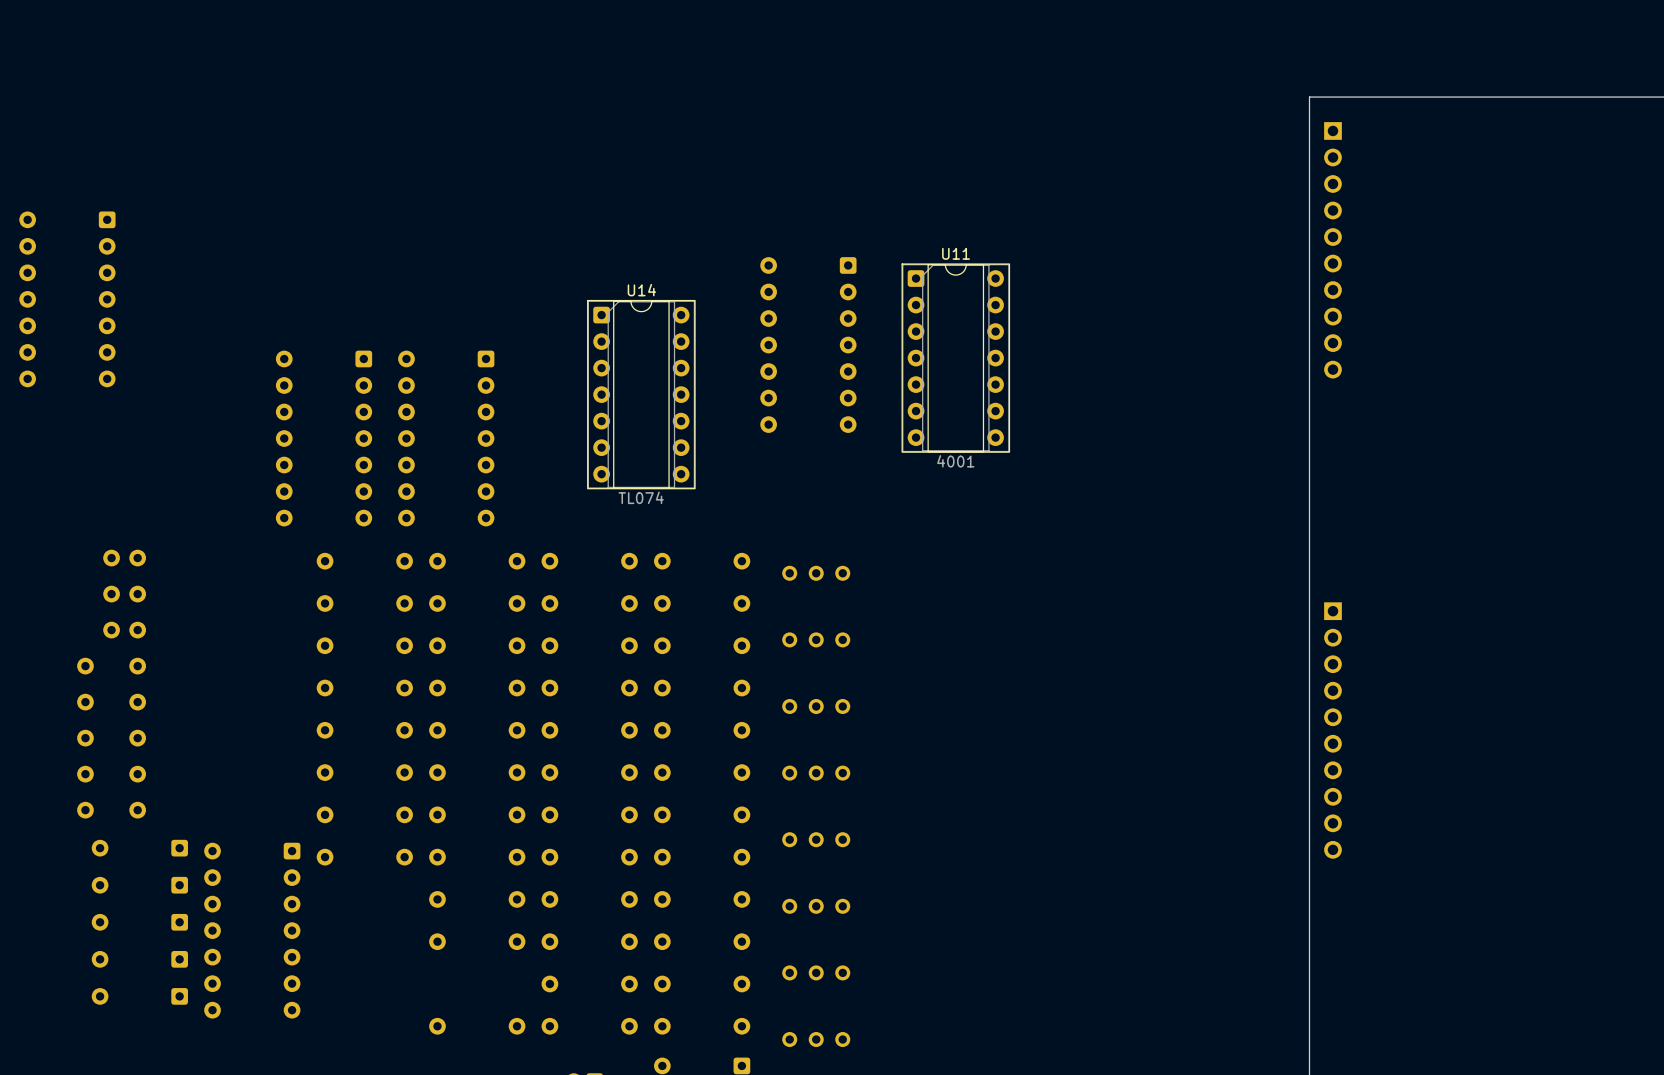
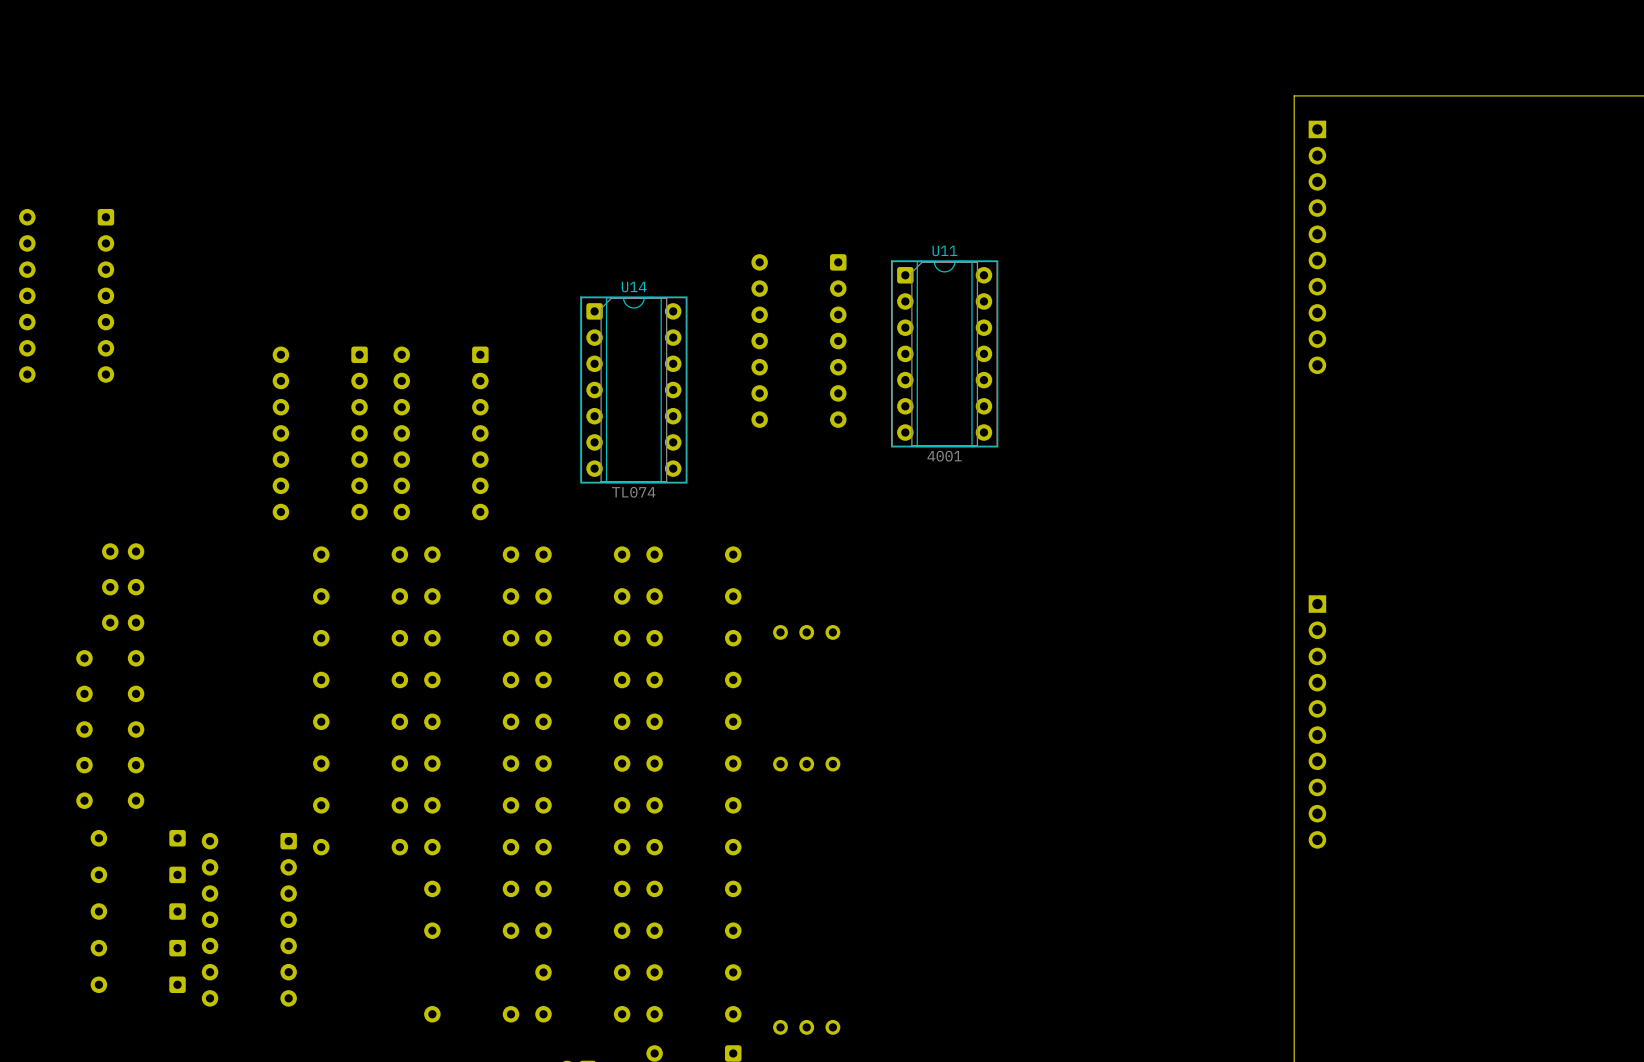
part: (816, 573) -> none
part: (816, 706) -> none
part: (816, 839) -> none
part: (816, 906) -> none
part: (816, 972) -> none

